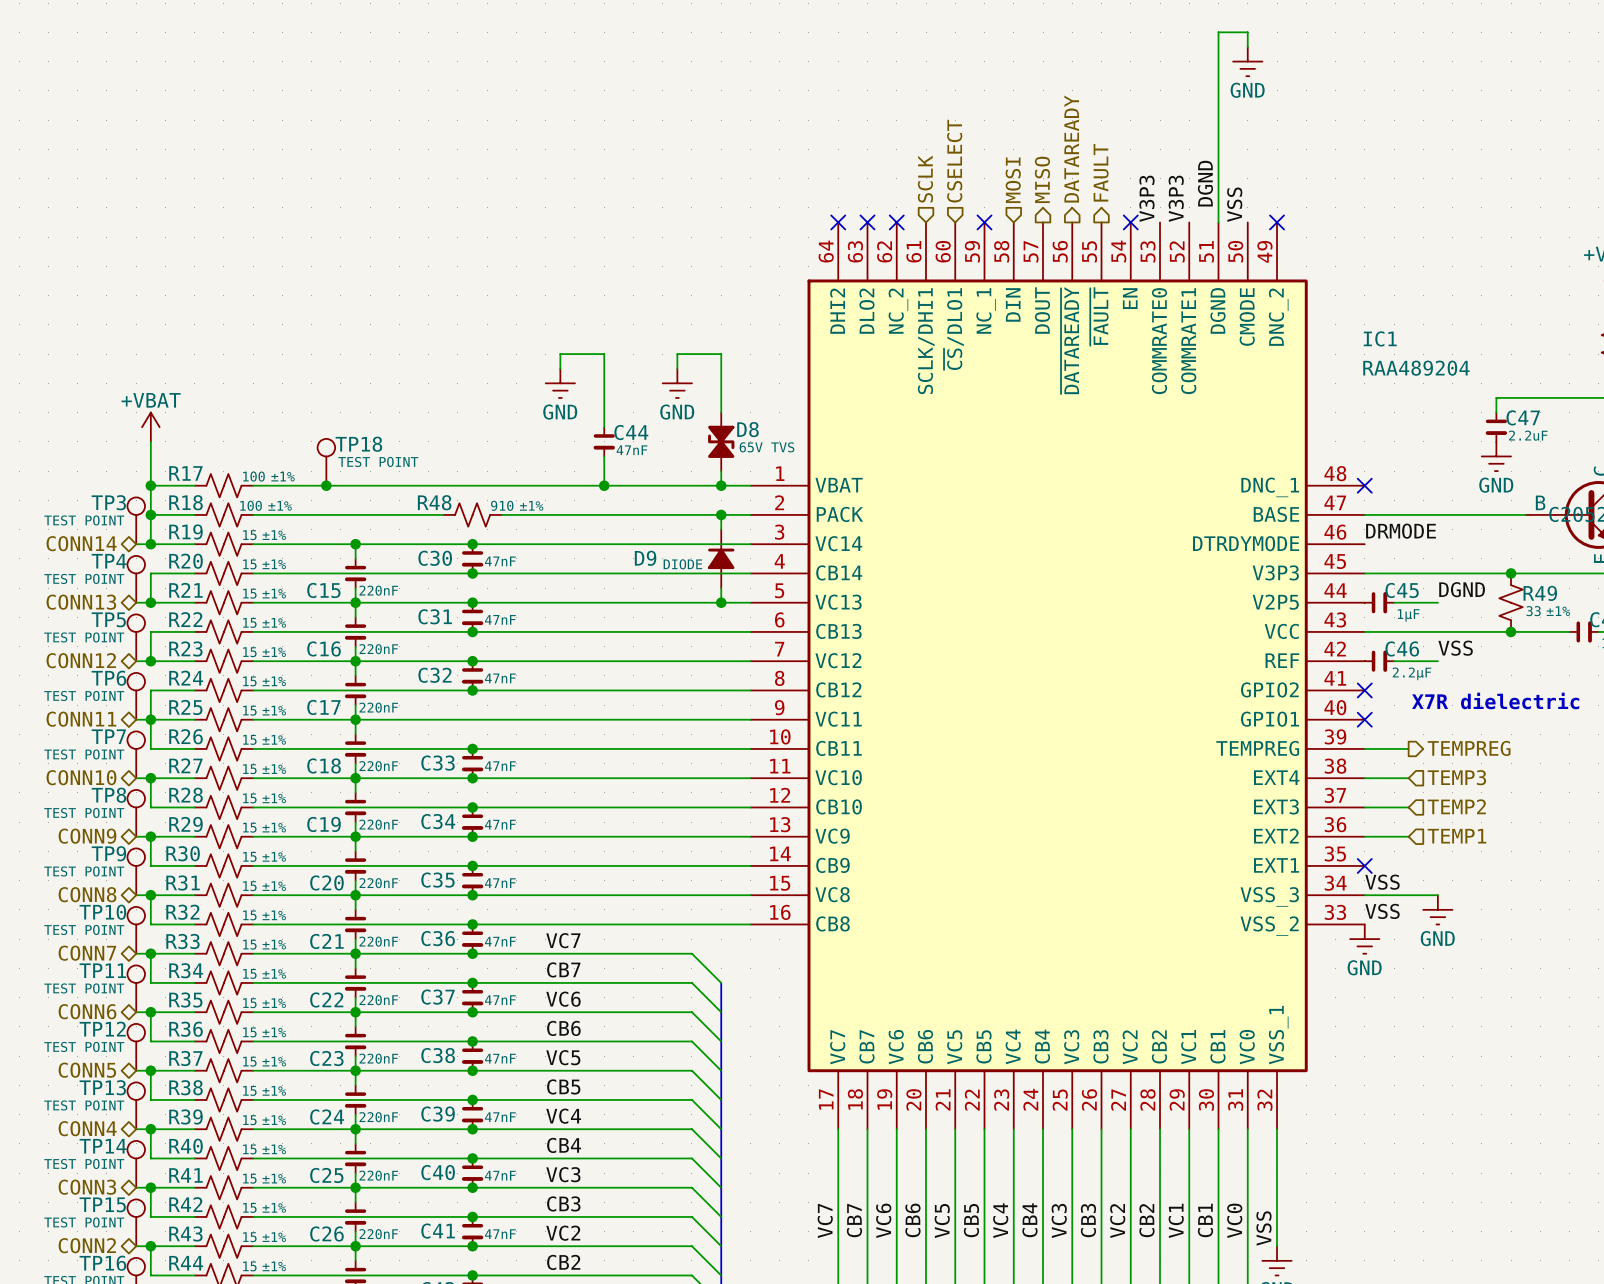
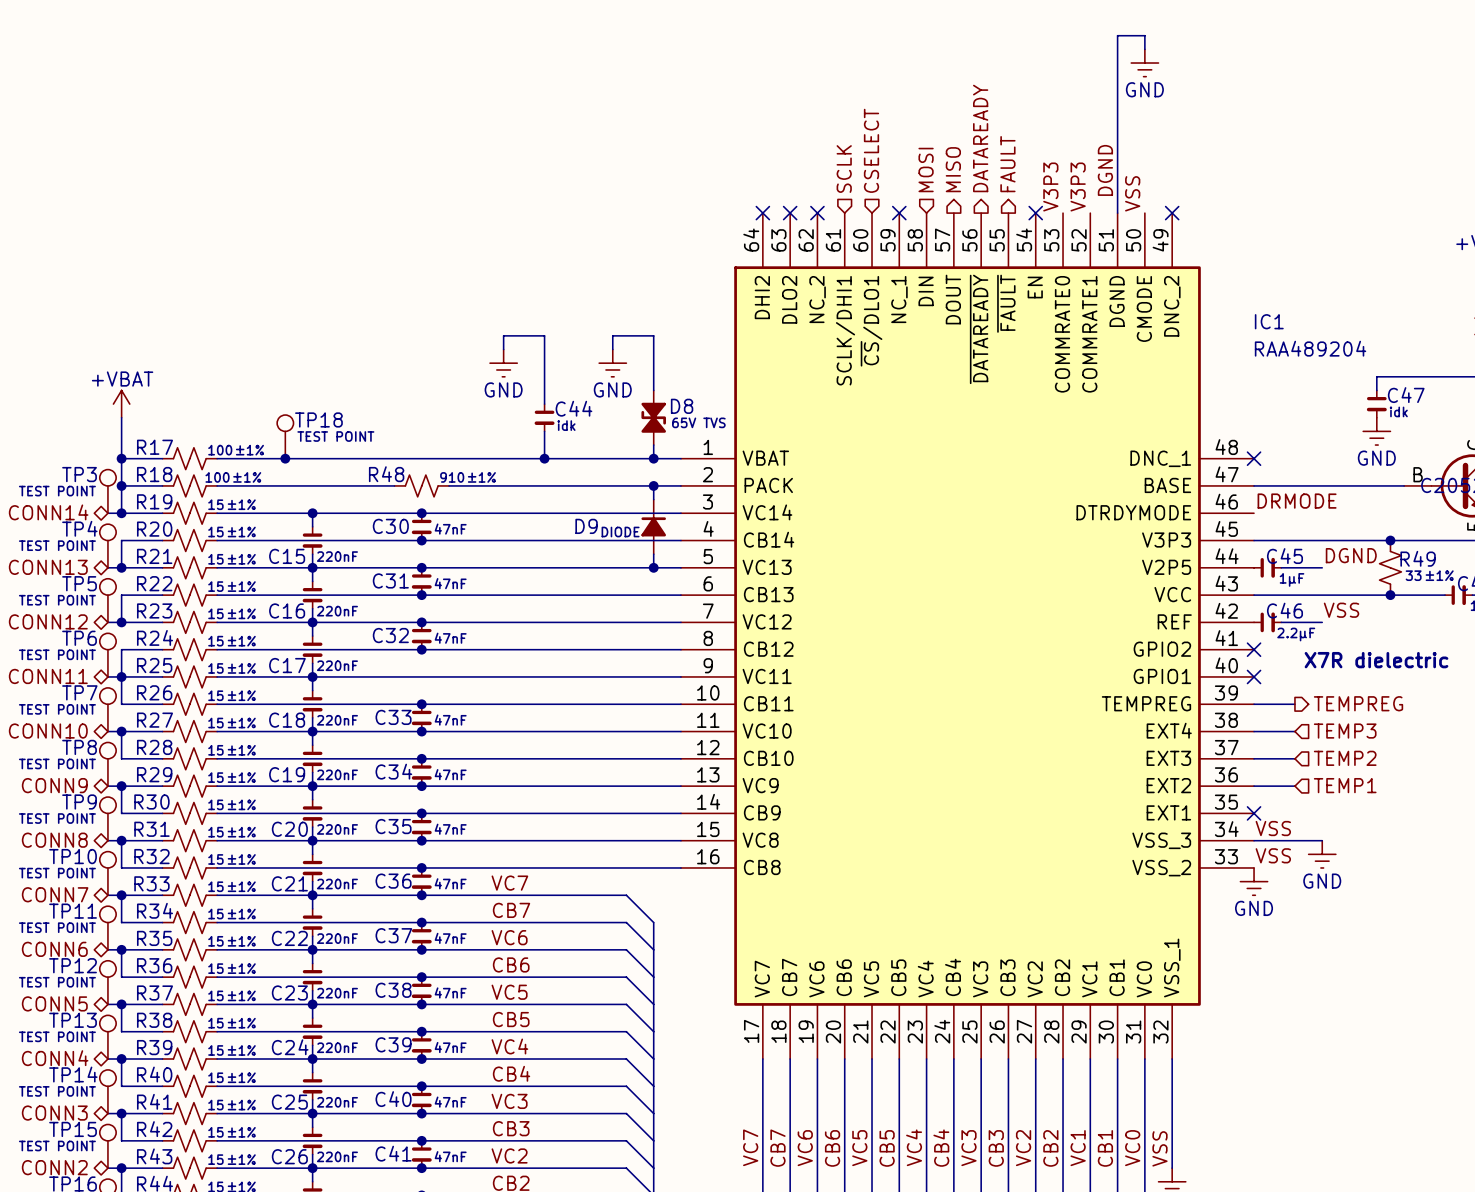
C47 value: 2.2uF (1528, 435) -> idk (1398, 411)
C44 value: 47nF (631, 450) -> idk (566, 425)

